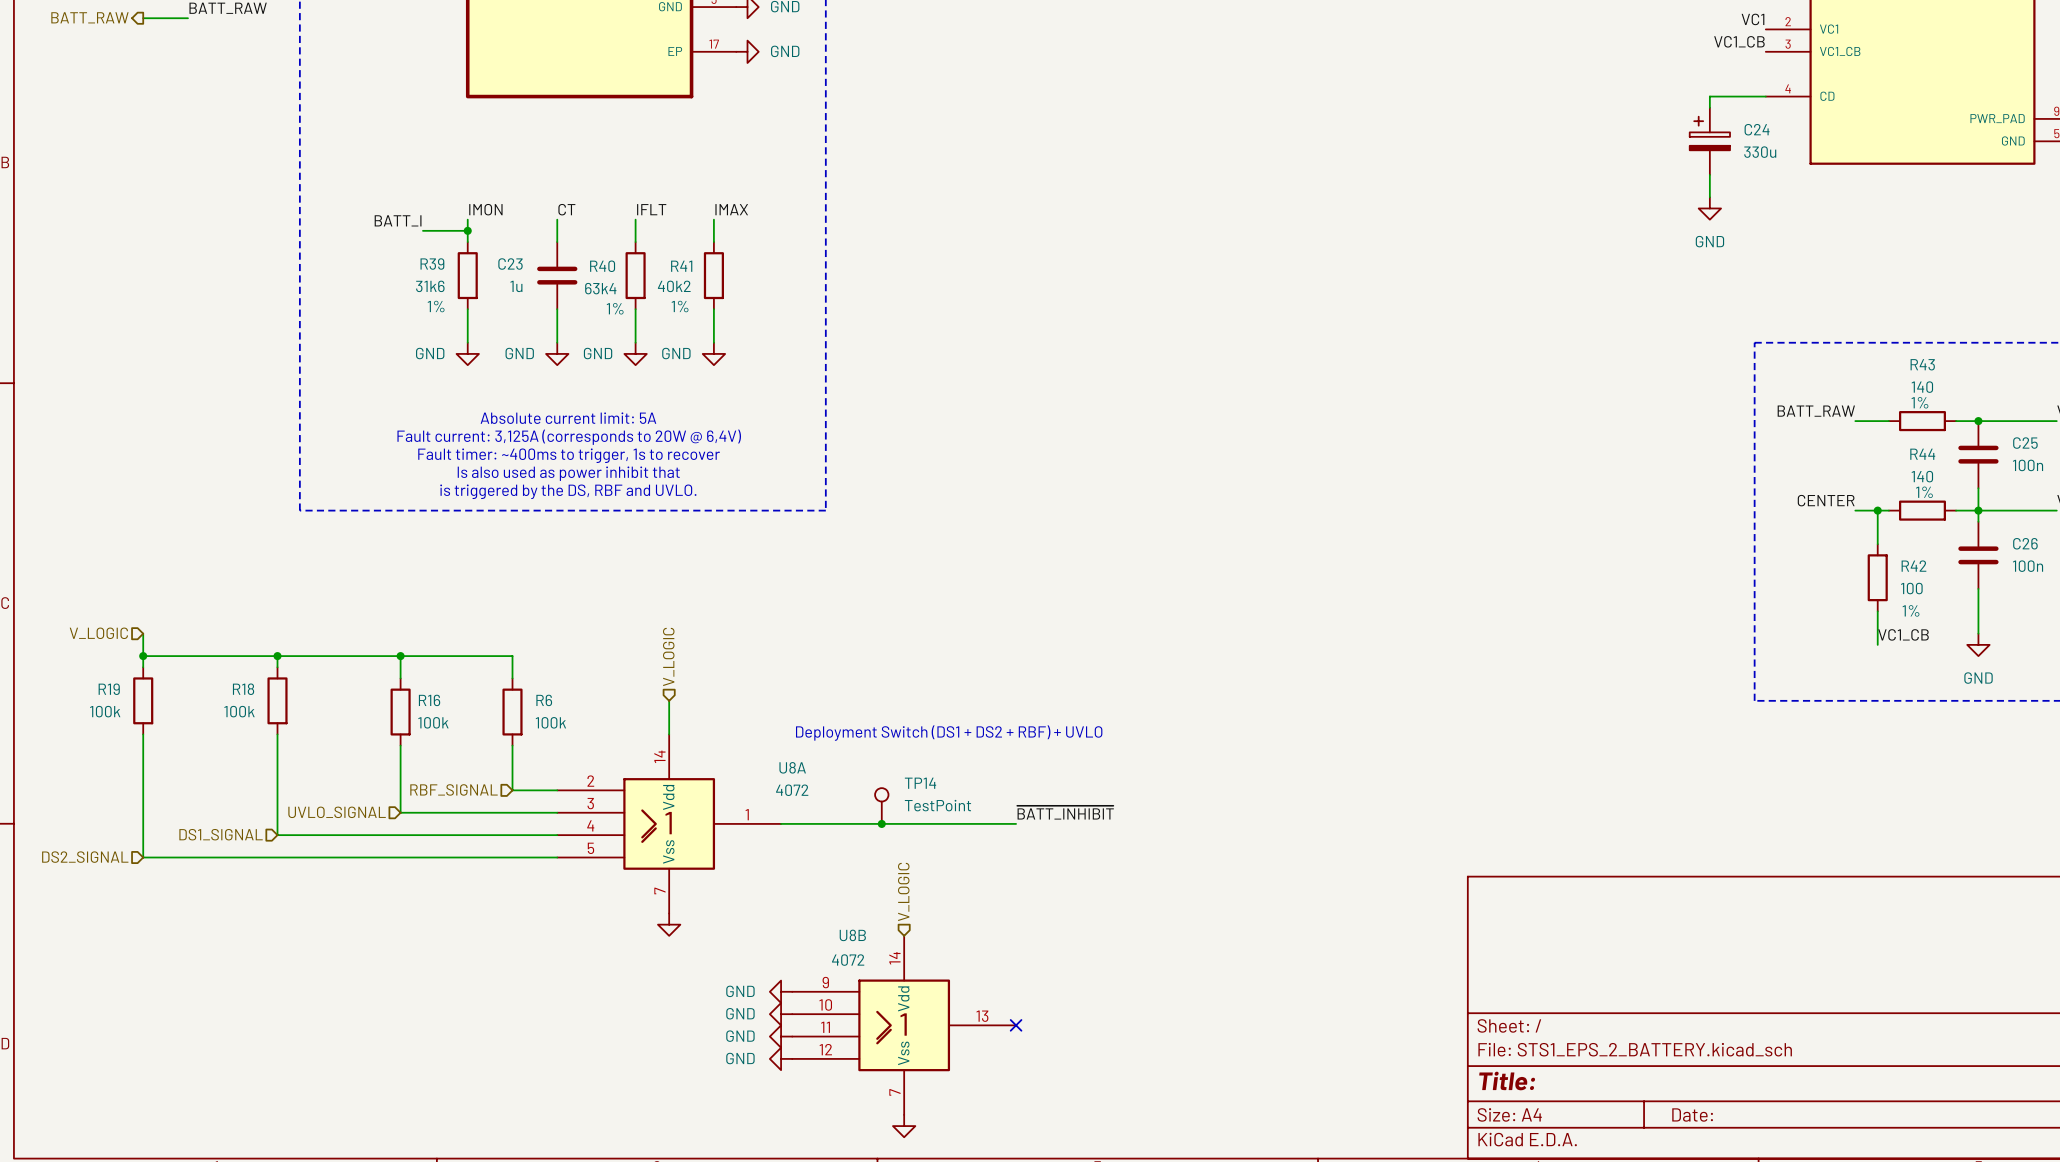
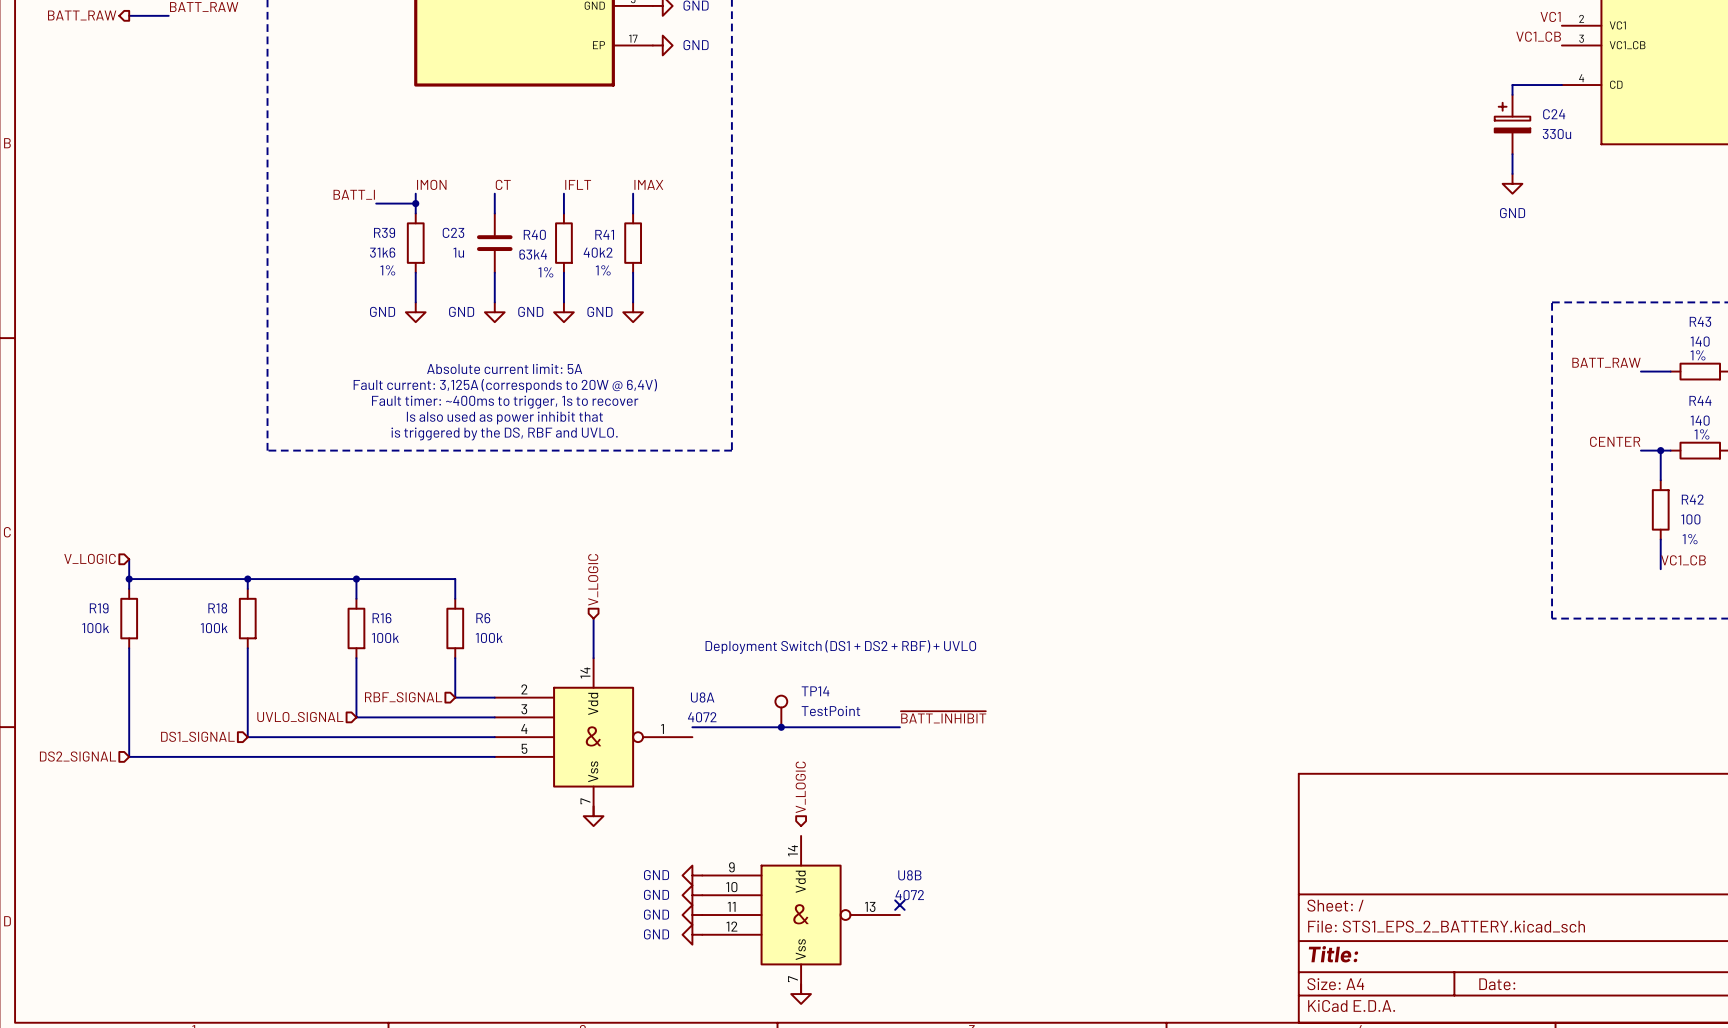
U8A symbol: [557, 734, 782, 914] -> [494, 658, 693, 817]
U8B symbol: [792, 935, 1017, 1115] -> [702, 835, 900, 995]
U8B name position: U8B (852, 935) -> U8B (909, 875)
U8B value position: 4072 (848, 960) -> 4072 (909, 895)

